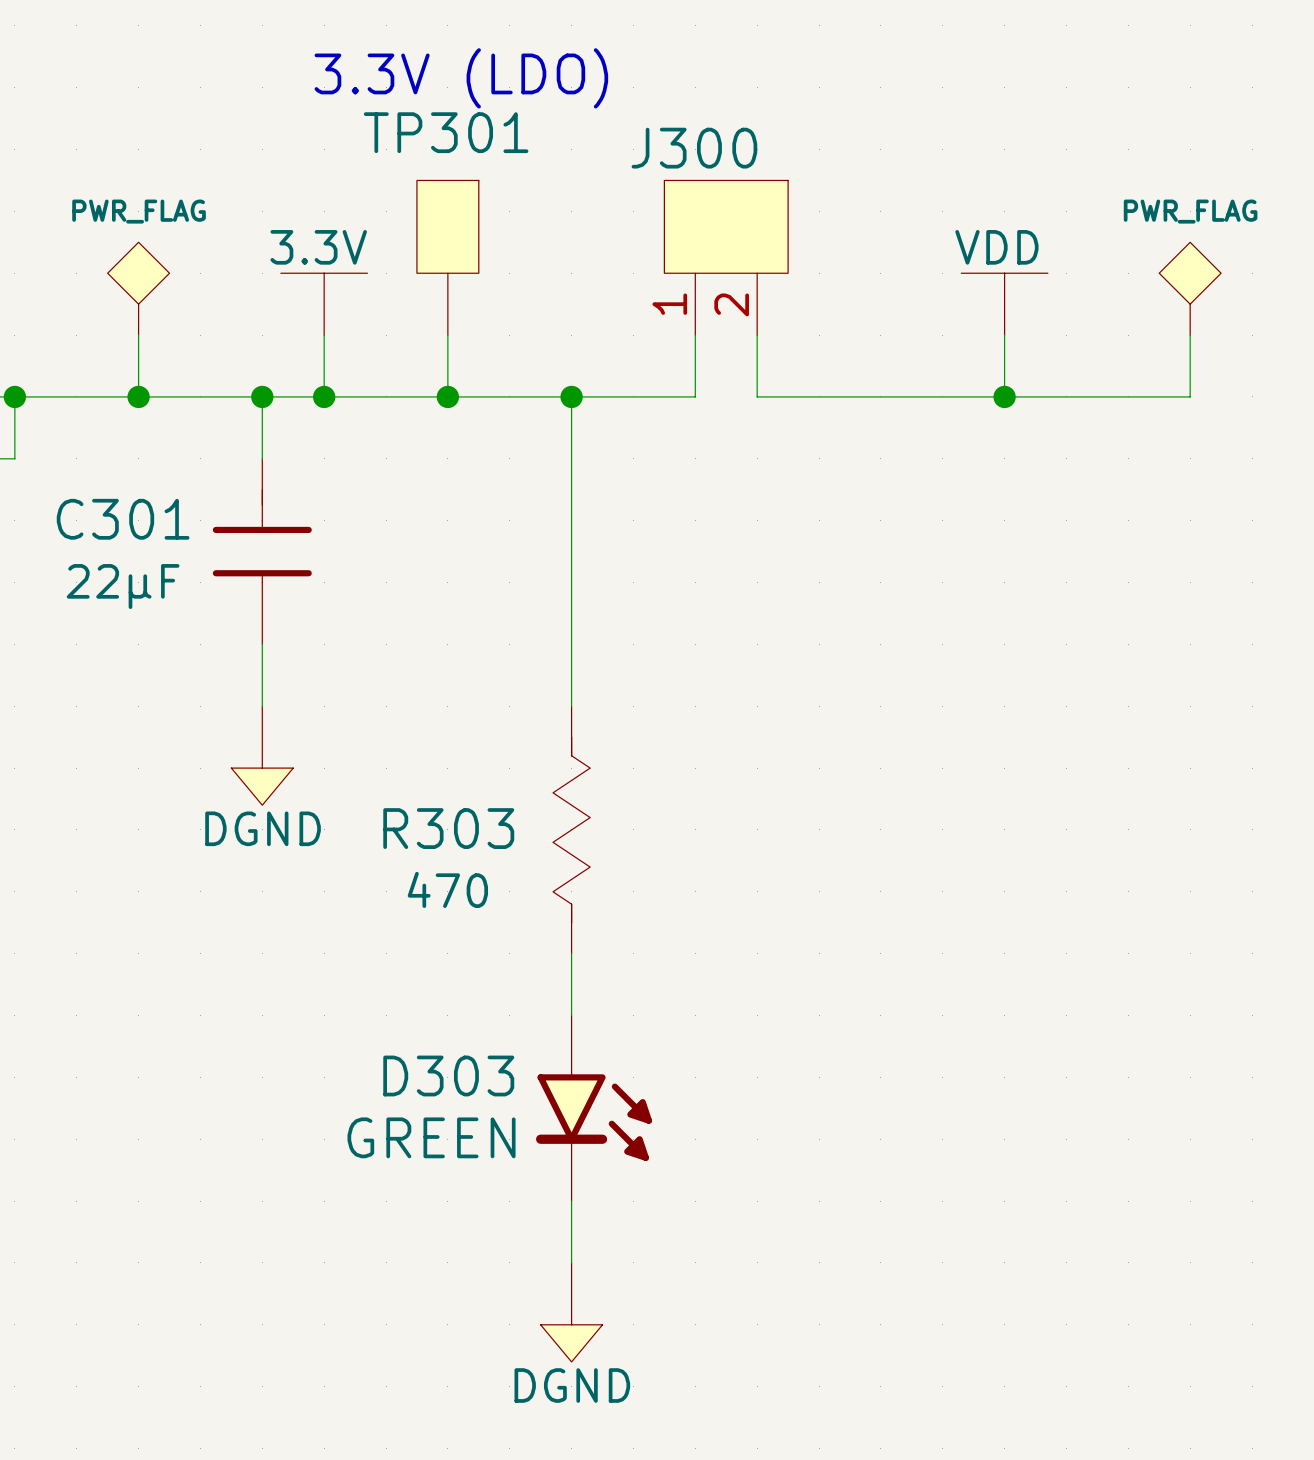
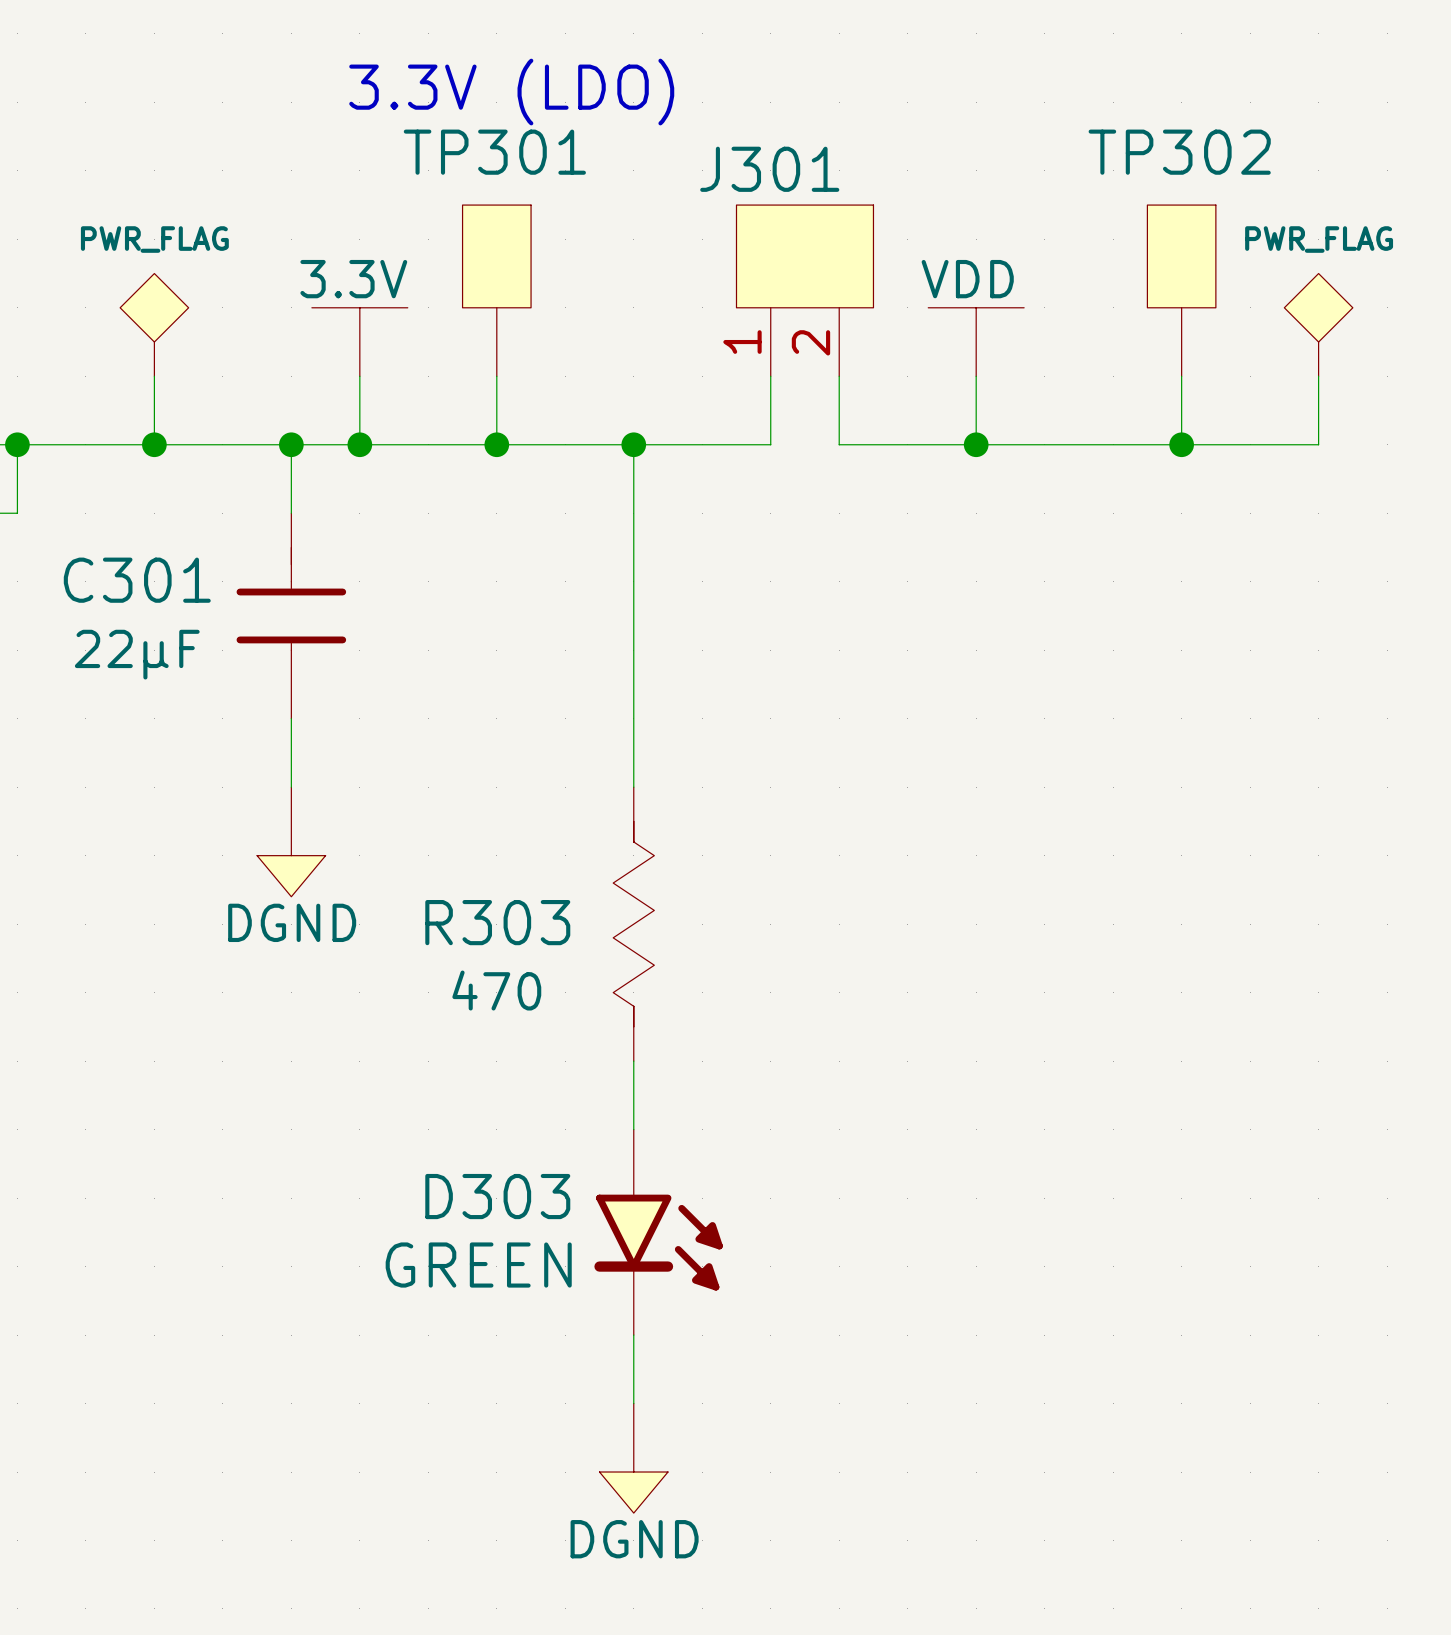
J300 name: J300 (694, 148) -> J301 (769, 169)
TP302: none -> (1181, 290)
power symbol position: VDD (1004, 304) -> VDD (976, 342)
wire: none -> (976, 376) (976, 444)
wire: (1004, 335) (1004, 396) -> (1181, 376) (1181, 444)
junction: none -> (976, 444)
junction: (1004, 396) -> none
junction: none -> (1181, 444)

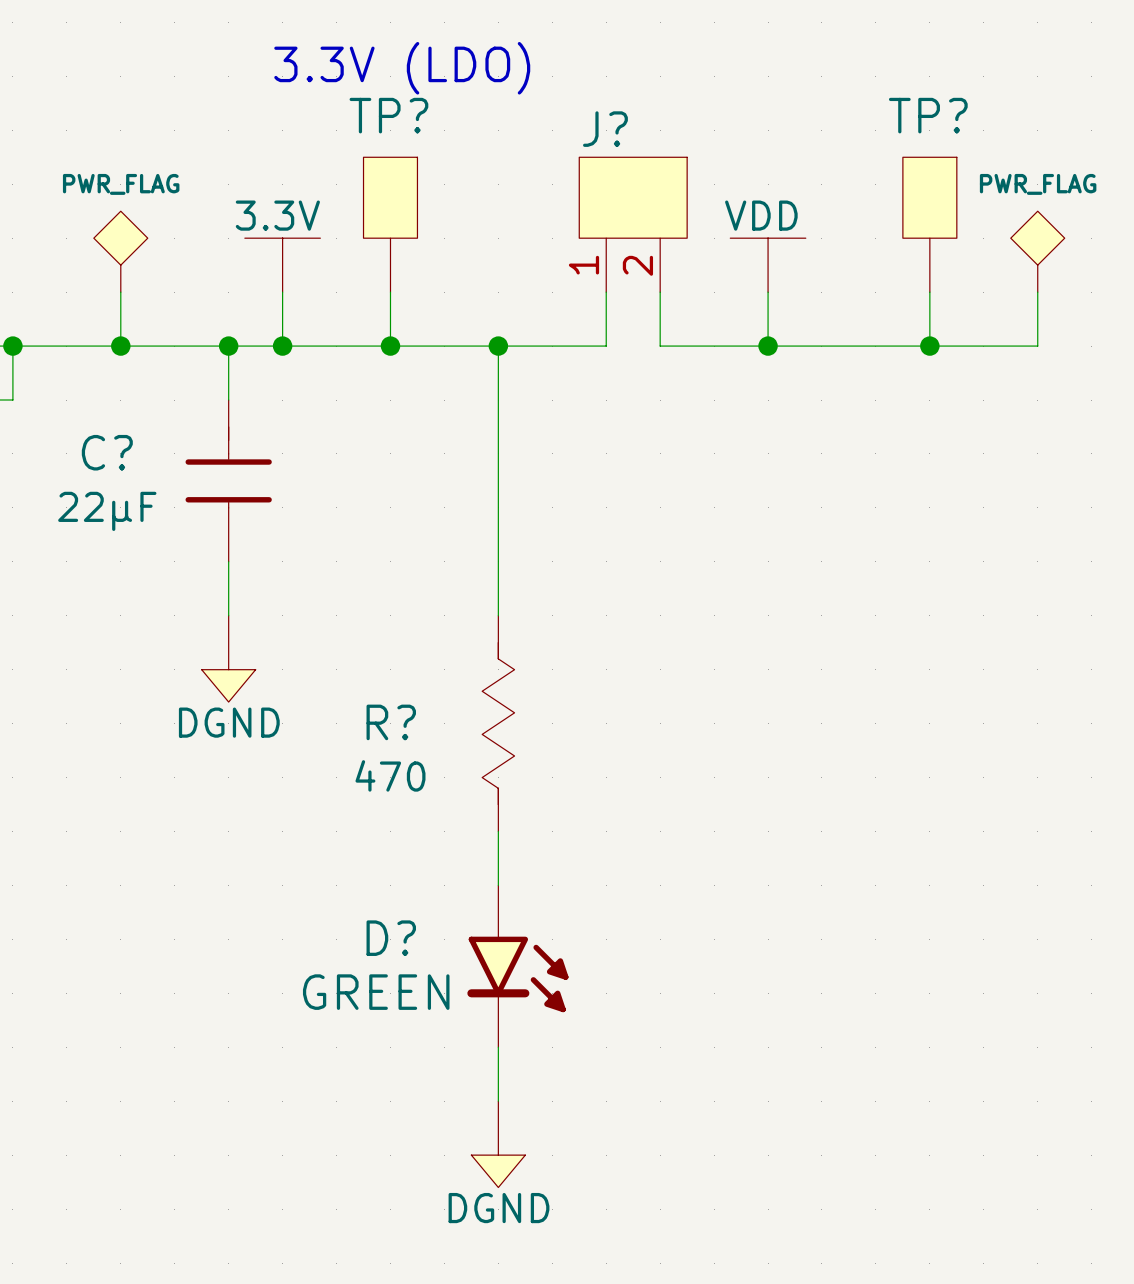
TP301 name: TP301 (494, 152) -> TP? (388, 115)
TP302 name: TP302 (1179, 152) -> TP? (928, 115)
J301 name: J301 (769, 169) -> J? (605, 129)
C301 name: C301 (137, 580) -> C? (107, 452)
R303 name: R303 (497, 922) -> R? (391, 722)
D303 name: D303 (497, 1196) -> D? (391, 938)

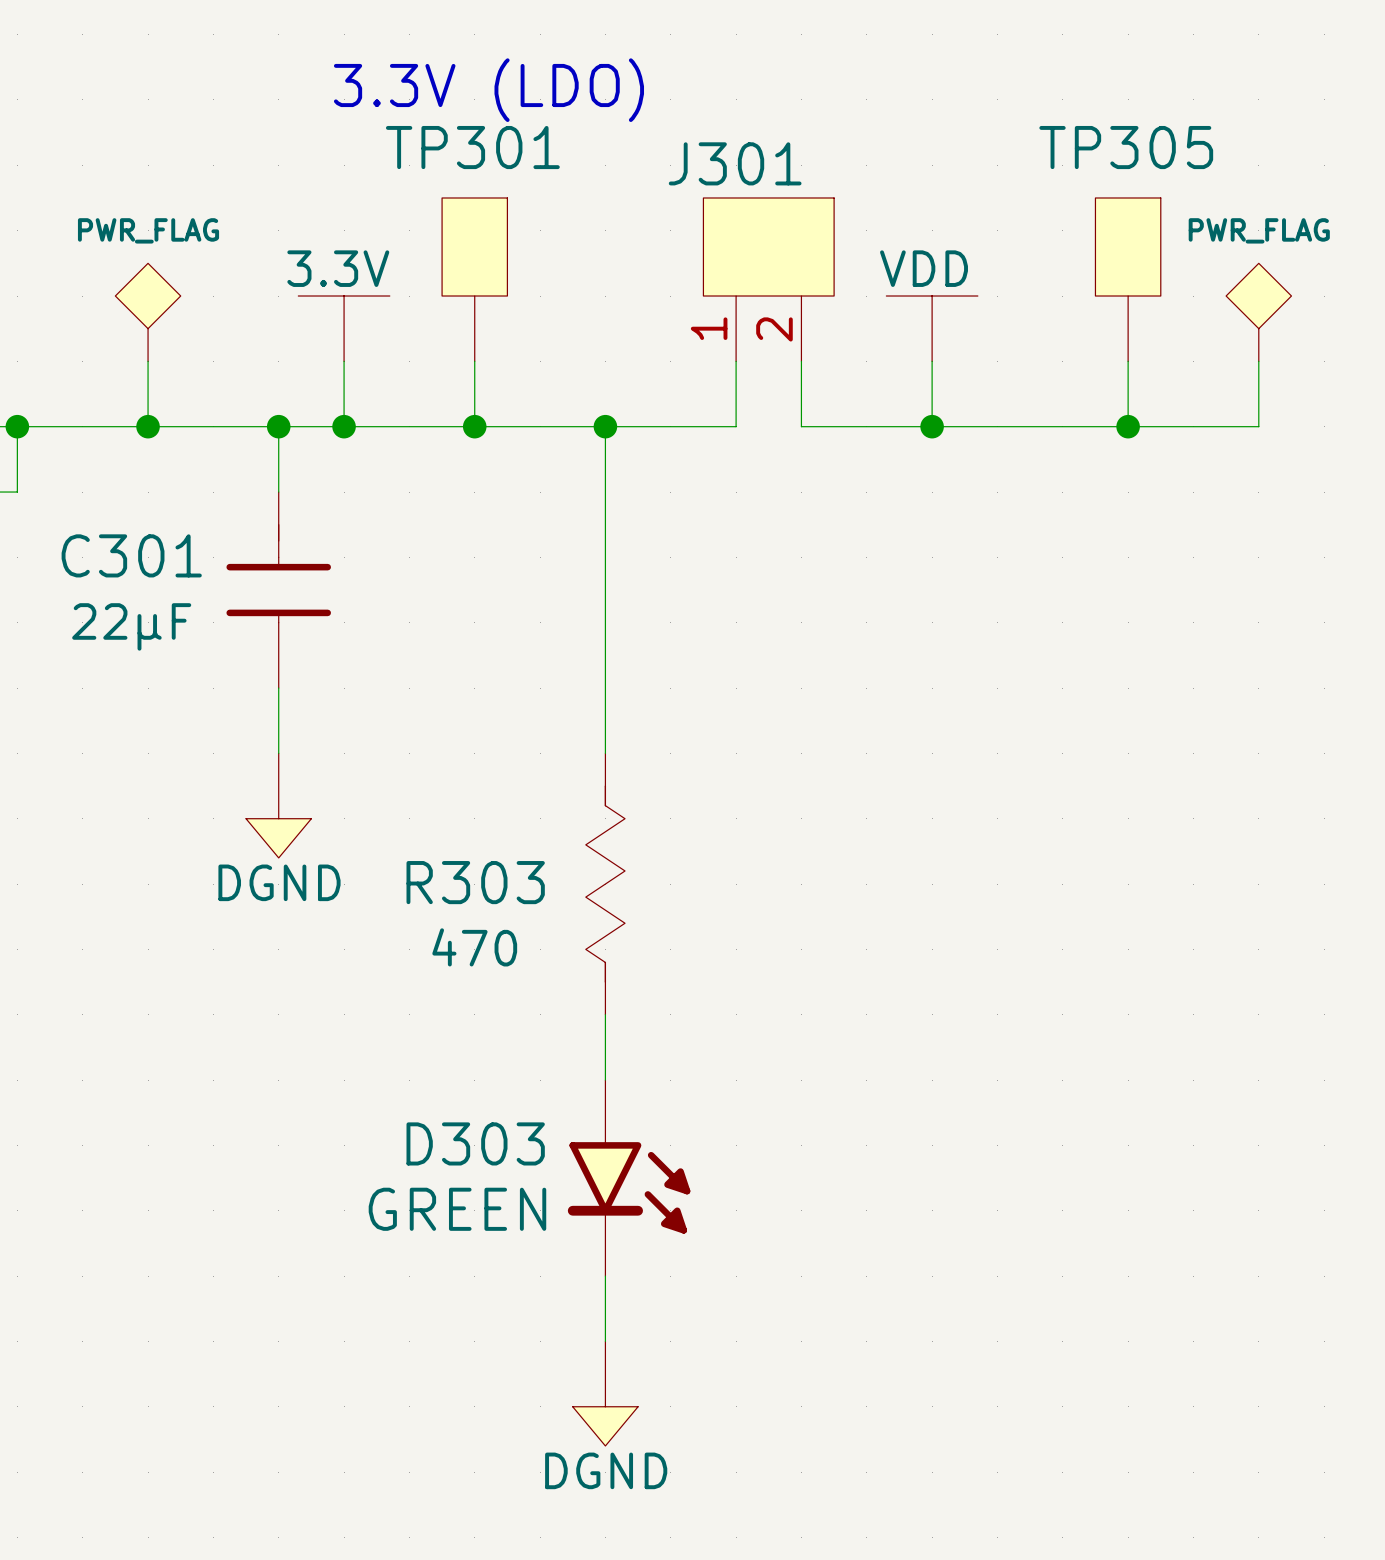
TP? name: TP? (388, 115) -> TP301 (472, 147)
TP? name: TP? (928, 115) -> TP305 (1126, 147)
J? name: J? (605, 129) -> J301 (735, 163)
C? name: C? (107, 452) -> C301 (131, 555)
R? name: R? (391, 722) -> R303 (475, 882)
D? name: D? (391, 938) -> D303 (475, 1143)

